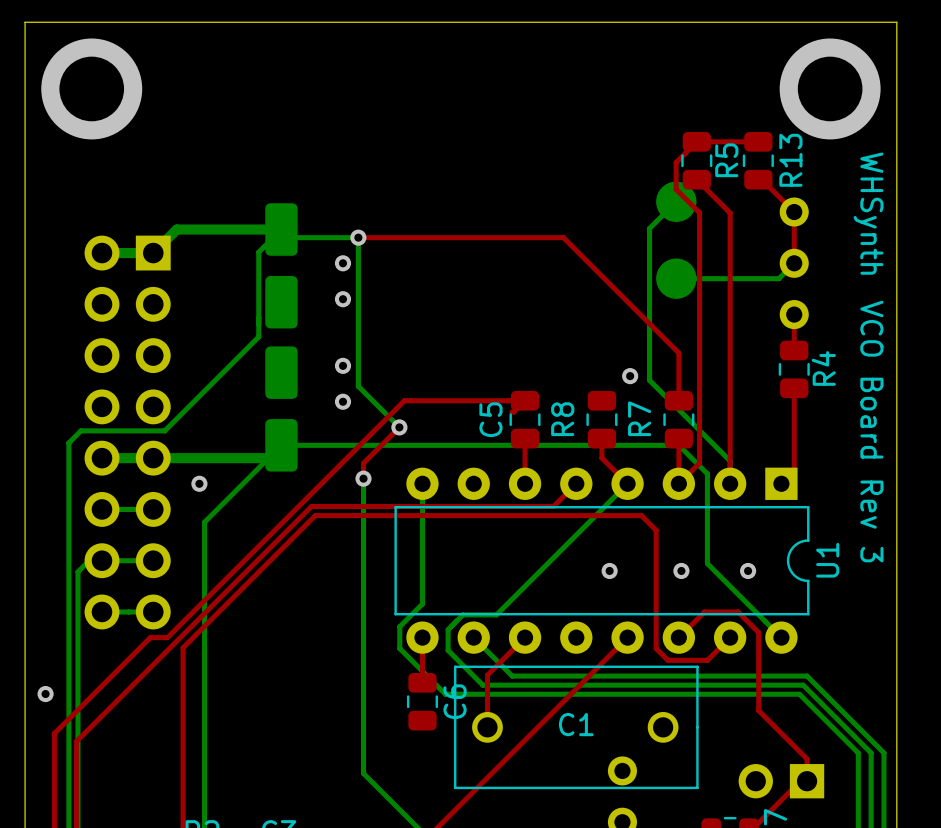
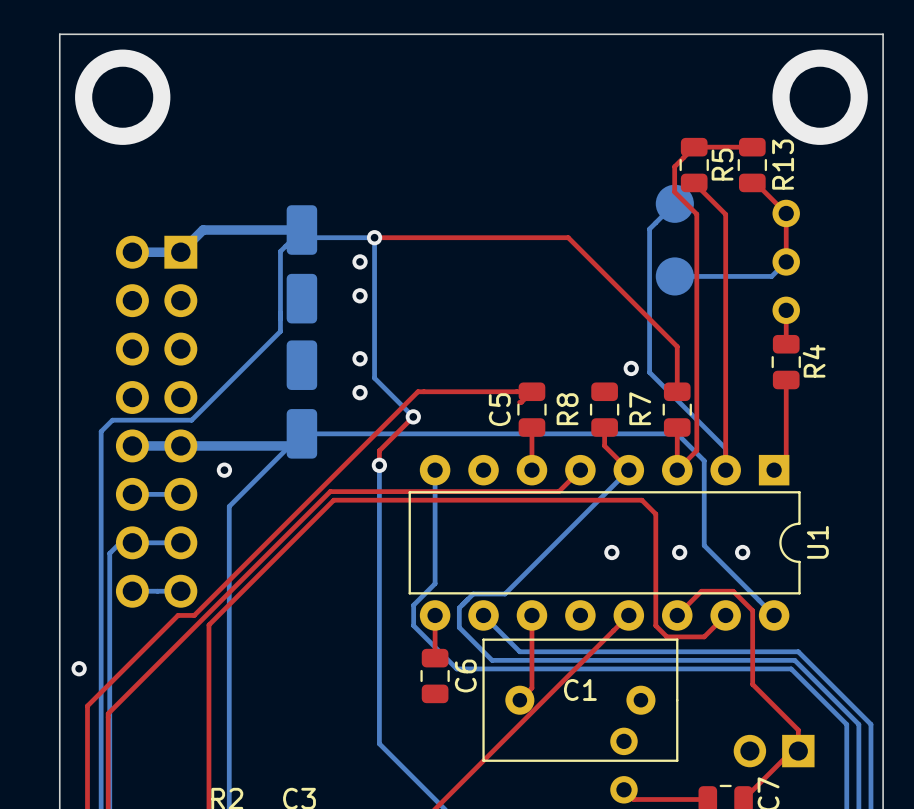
text: WHSynth (868, 213) -> none
text: VCO Board Rev 3 (871, 431) -> none
top track: (525, 637) (487, 675) (487, 727) -> (531, 615) (531, 688) (519, 700)
C1 footprint: [453, 665, 699, 790] -> [482, 638, 679, 762]

